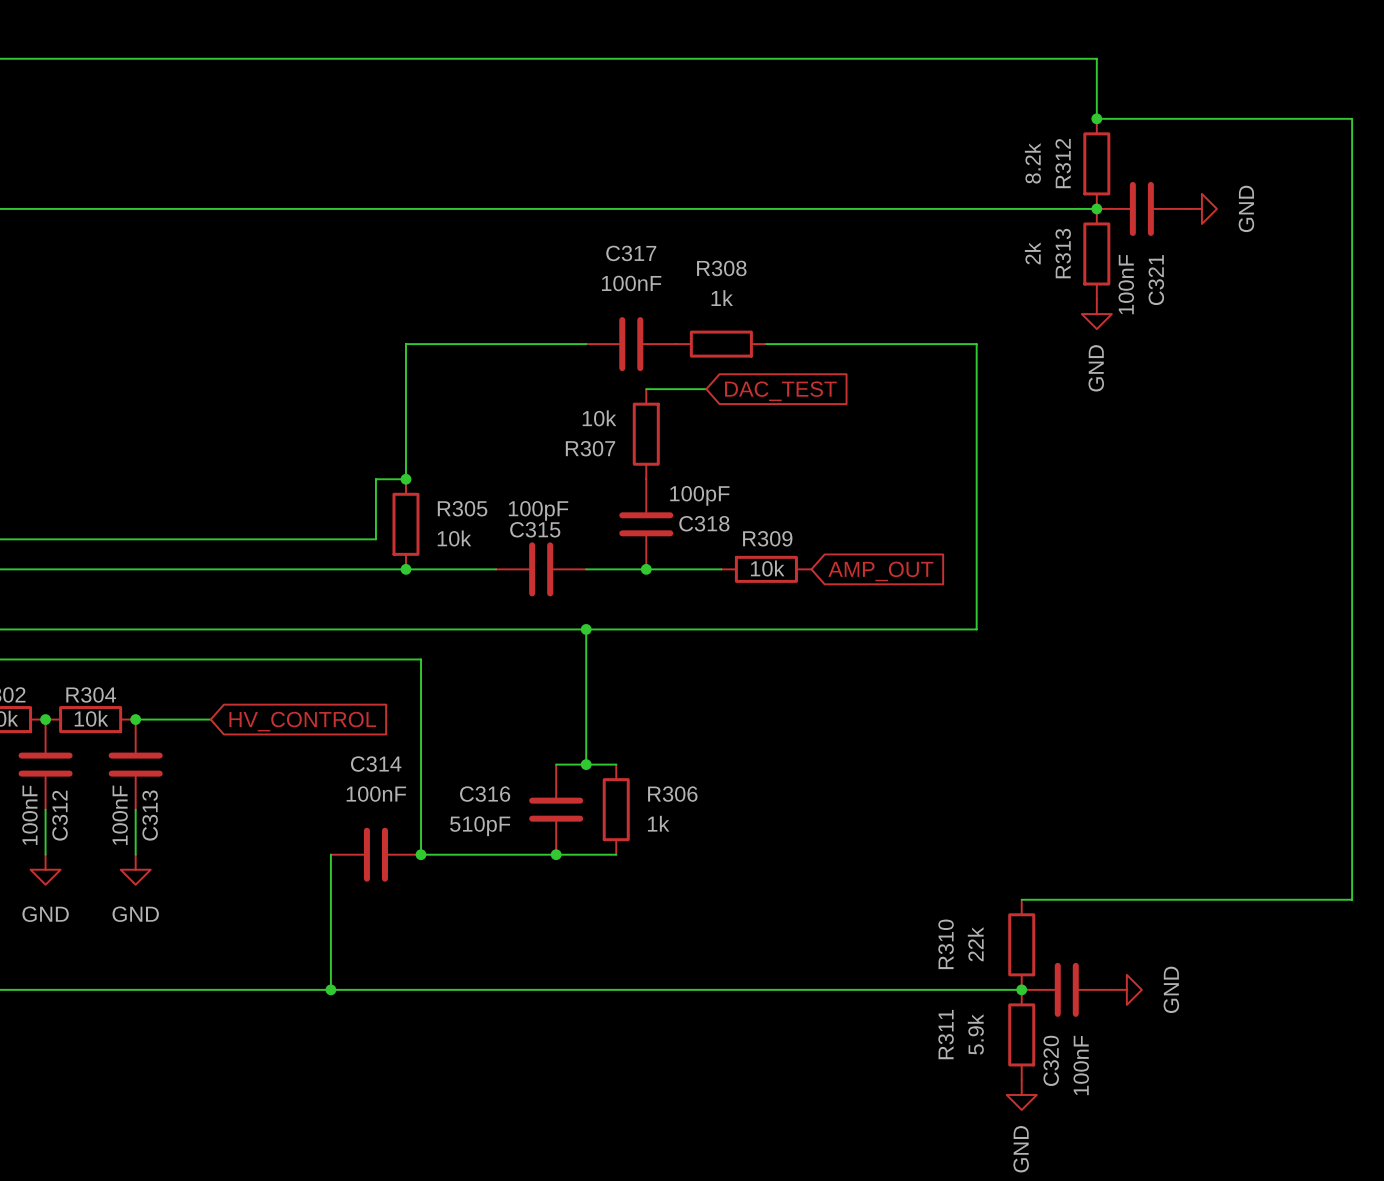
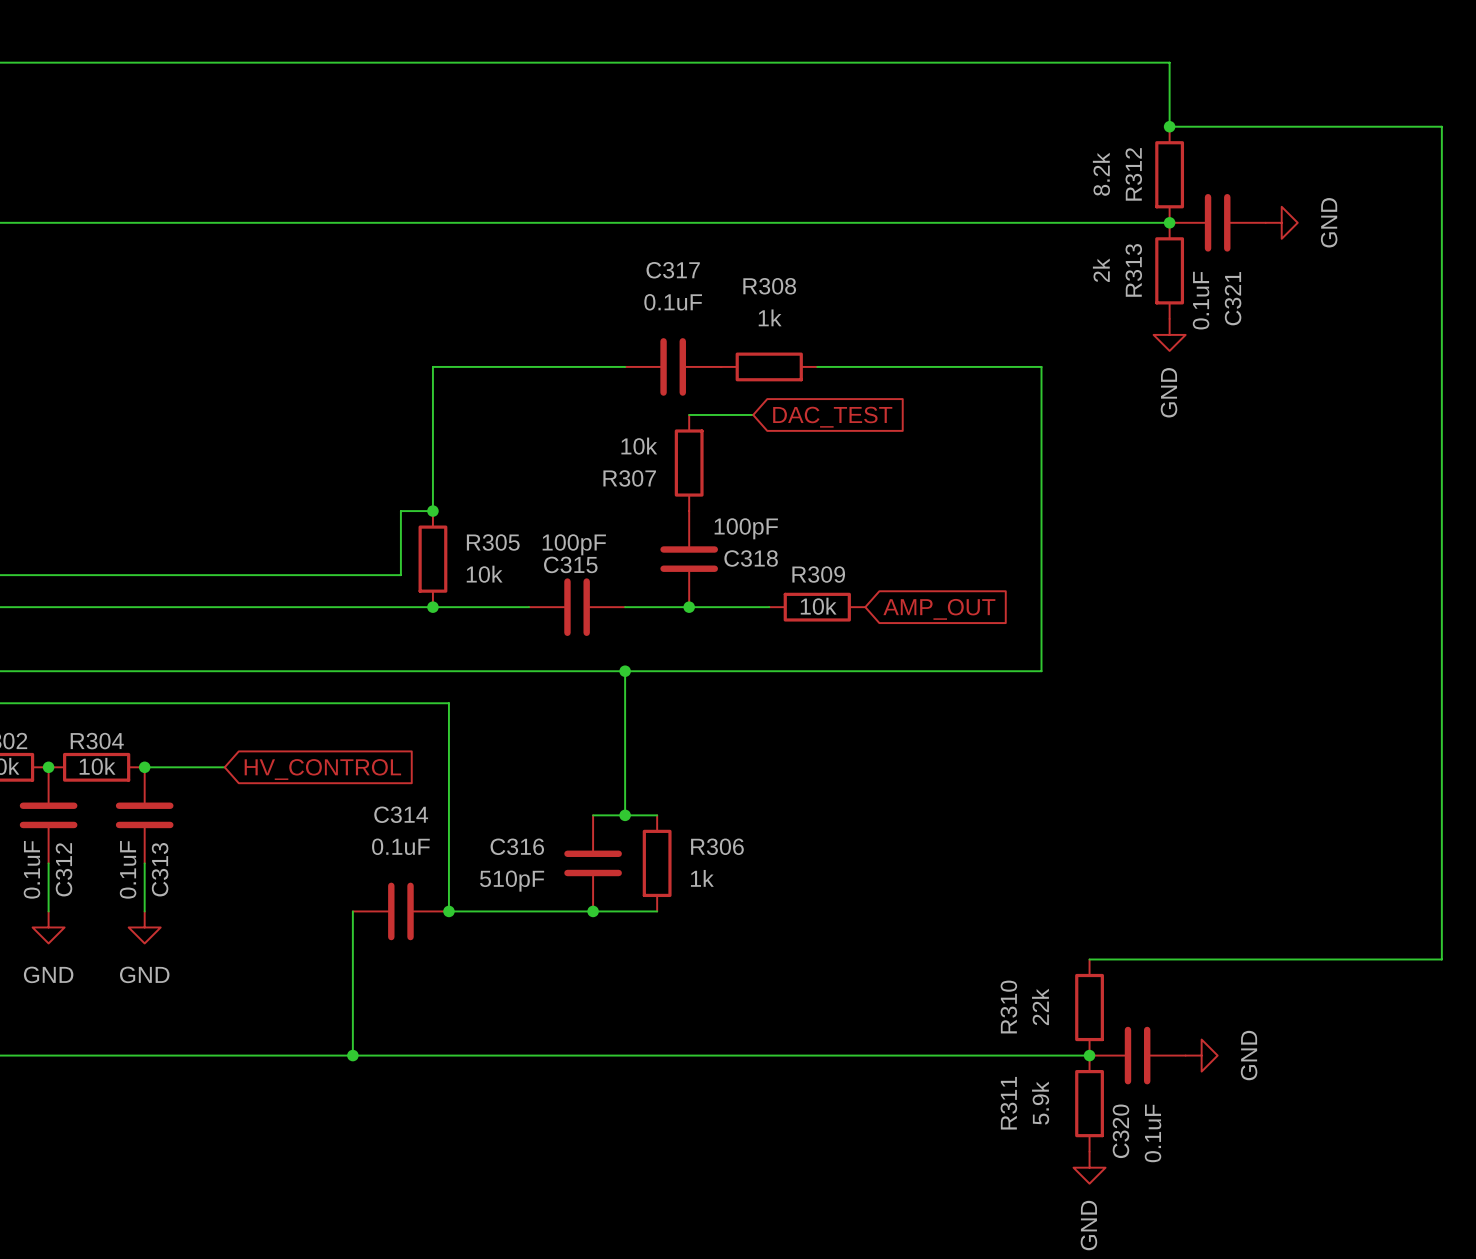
C317 value: 100nF (631, 283) -> 0.1uF (673, 302)
C321 value: 100nF (1126, 284) -> 0.1uF (1201, 300)
C314 value: 100nF (376, 794) -> 0.1uF (400, 846)
C312 value: 100nF (29, 815) -> 0.1uF (31, 869)
C313 value: 100nF (120, 815) -> 0.1uF (128, 869)
C320 value: 100nF (1081, 1065) -> 0.1uF (1153, 1133)

